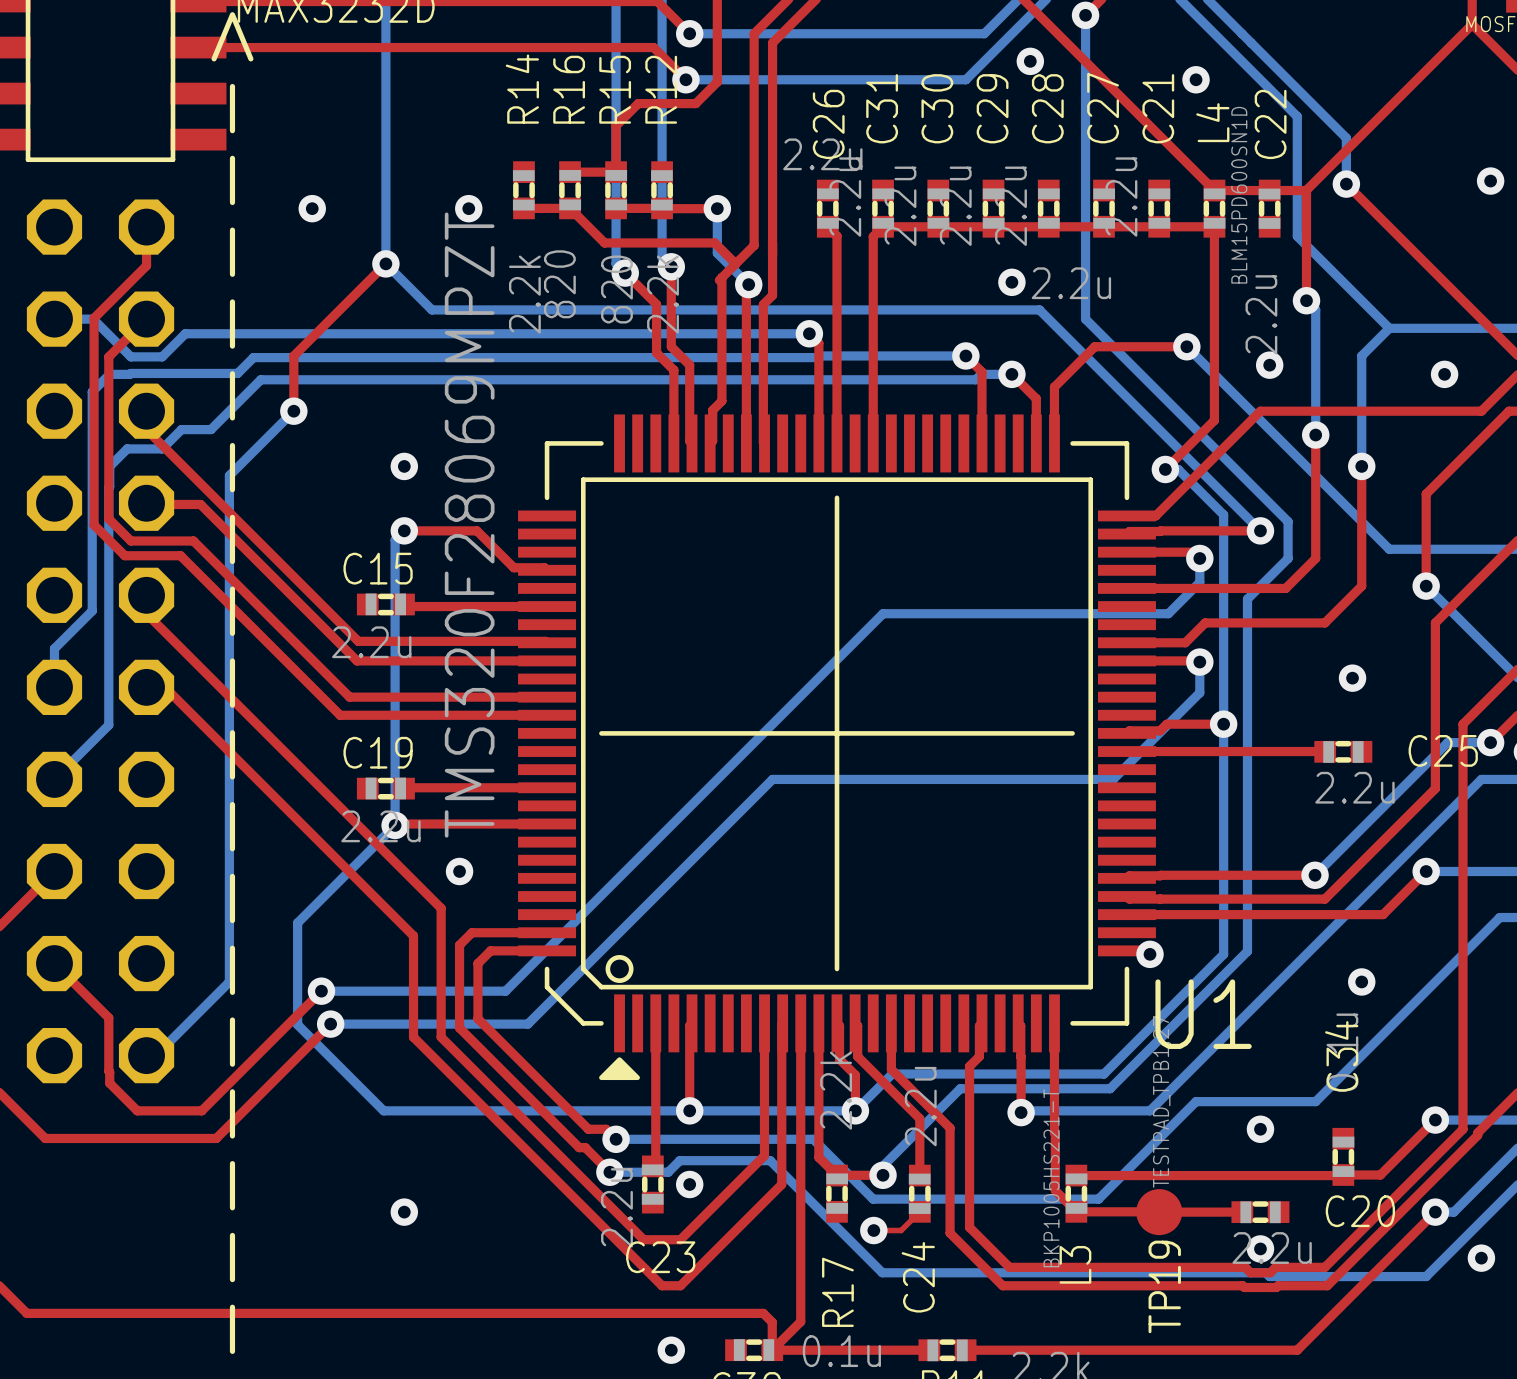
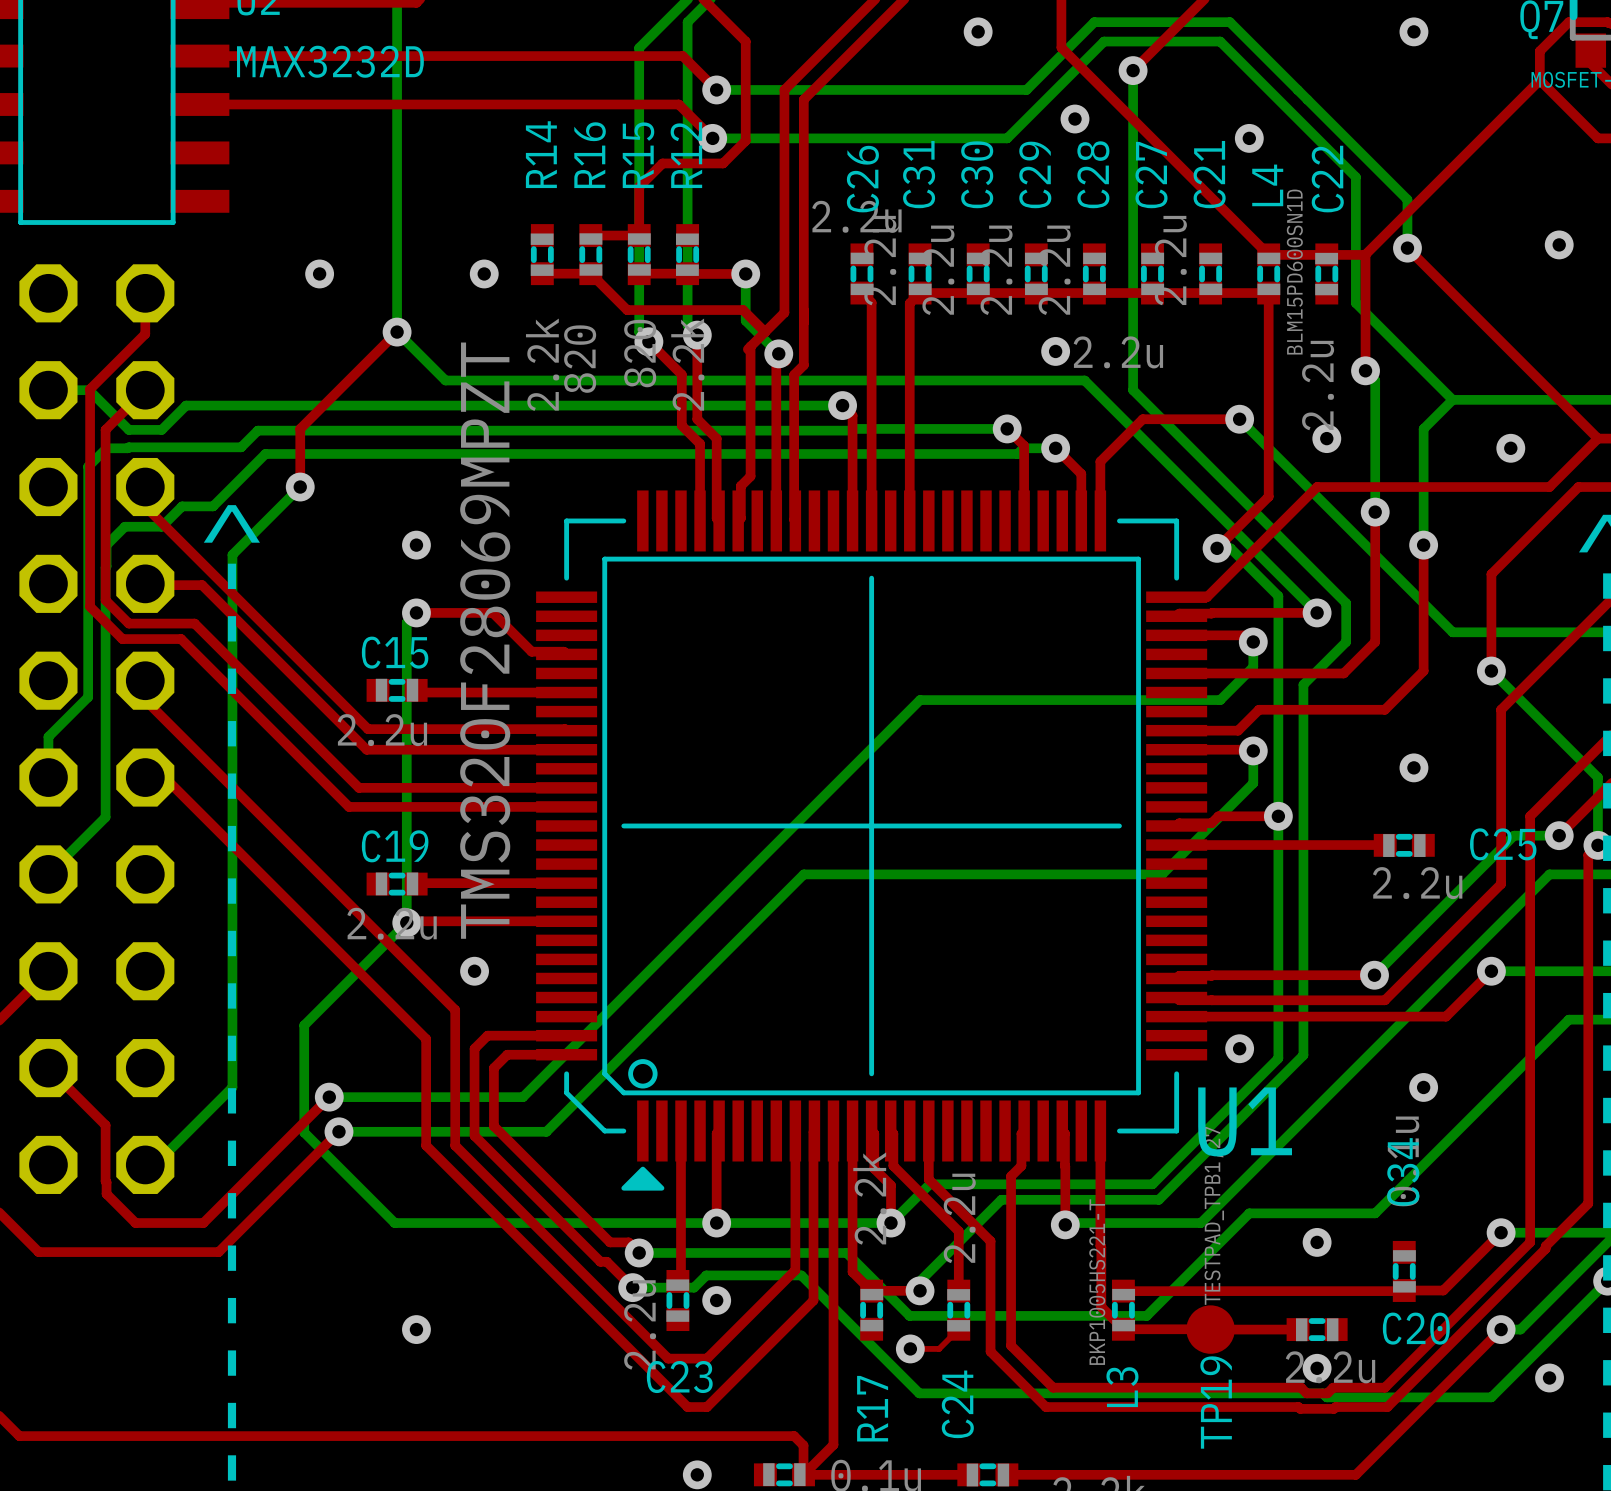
via position: (1150, 954) -> (1239, 1048)

